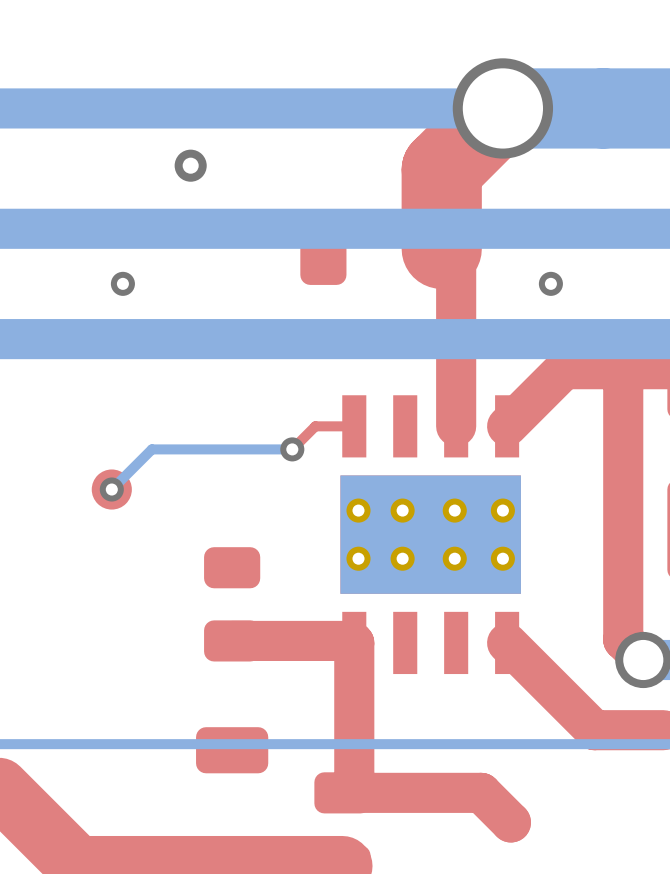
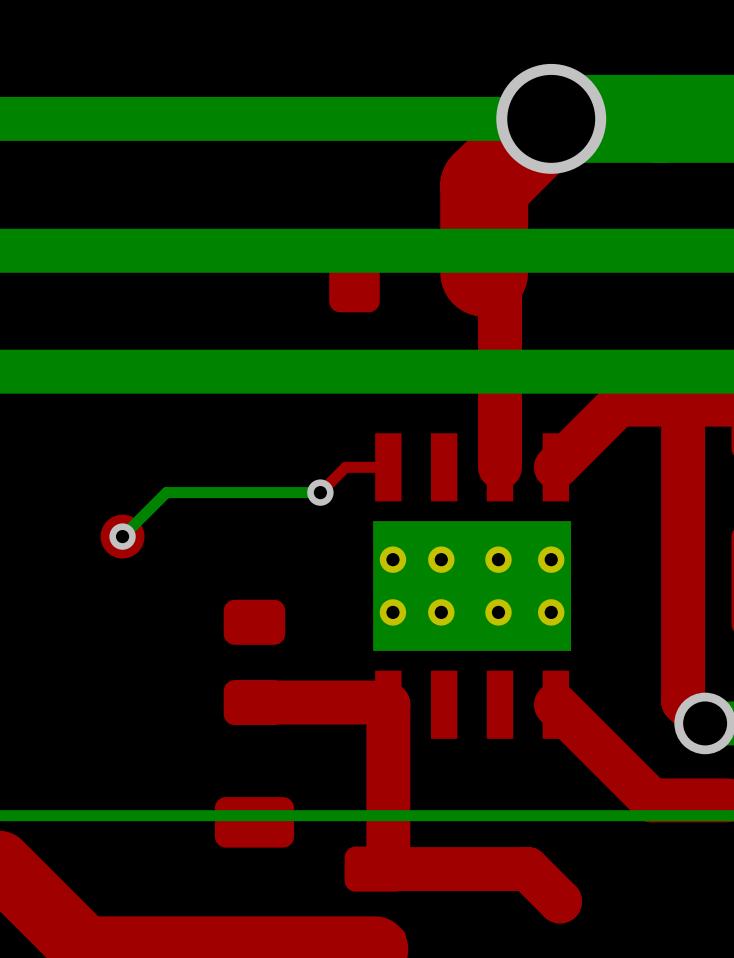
via: (190, 165) -> none
via: (122, 283) -> none
via: (550, 283) -> none

